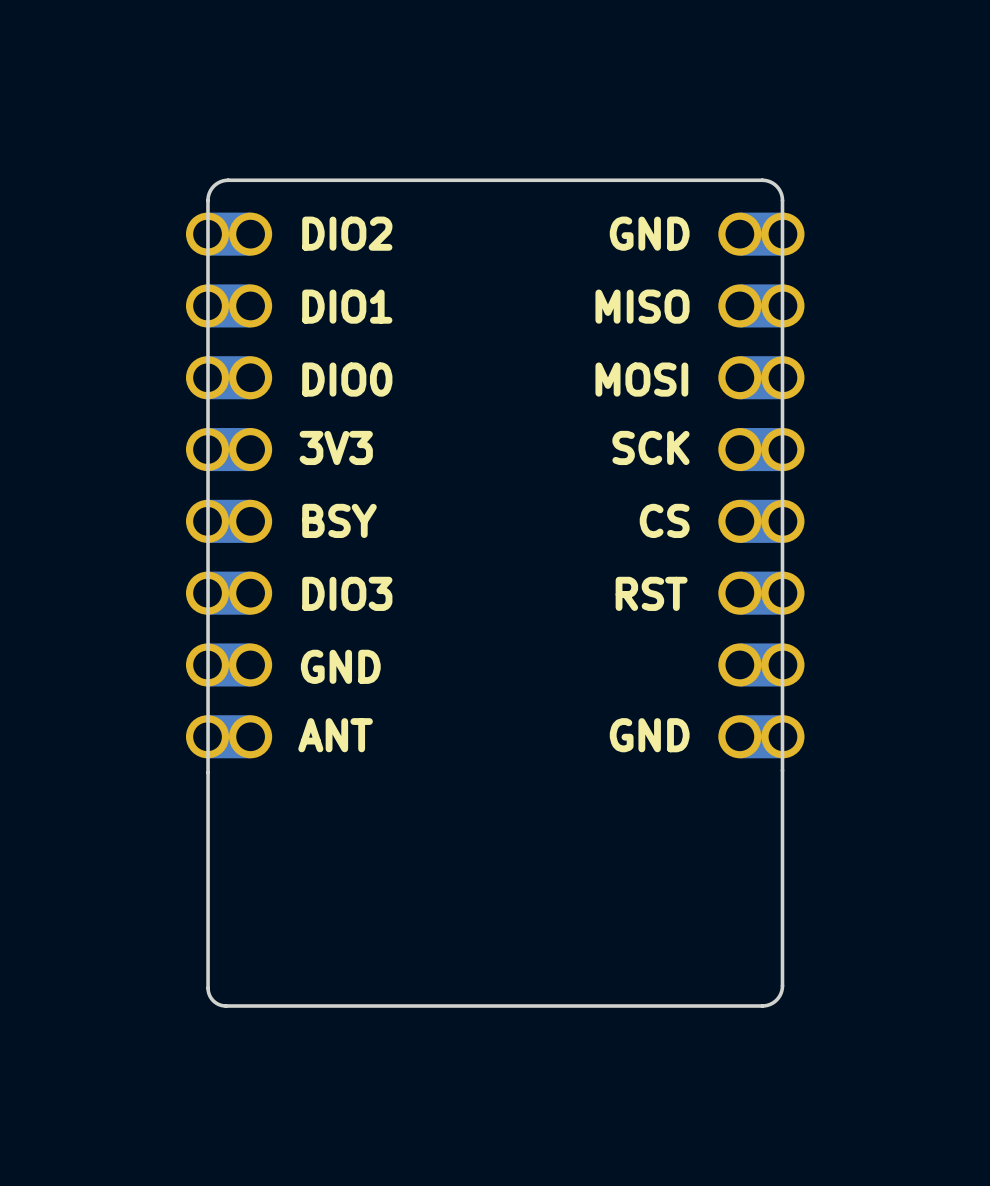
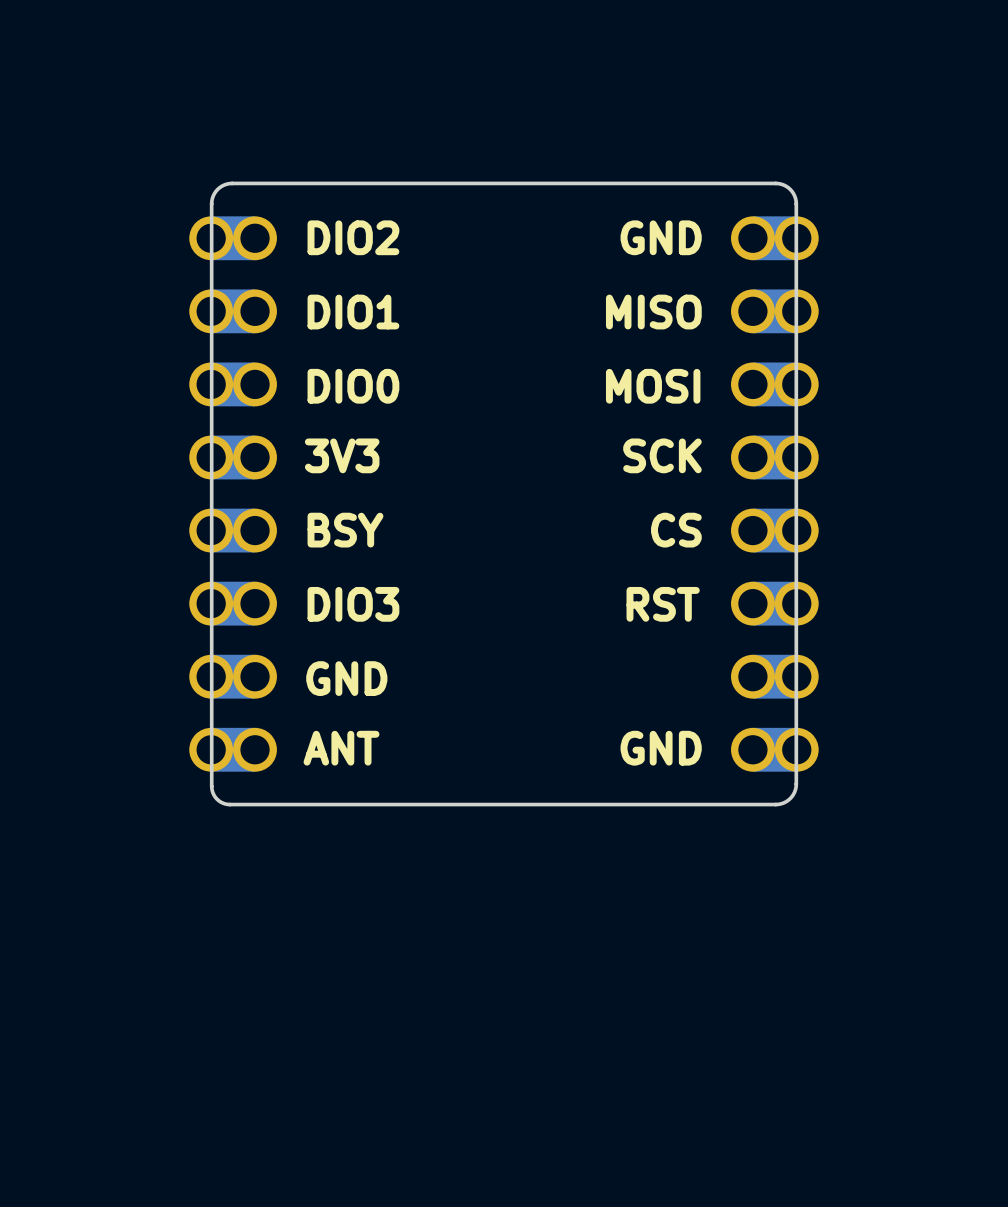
board edge: (782, 770) (782, 988) (776, 1000) (770, 1004) (762, 1006) (219, 1004) (211, 999) (208, 988) (208, 772) -> (796, 784) (794, 791) (790, 798) (783, 802) (775, 804) (229, 804) (217, 799) (211, 786)

